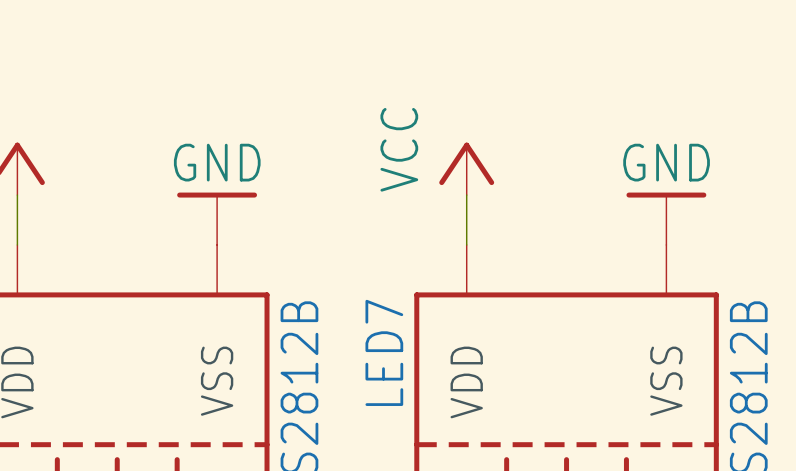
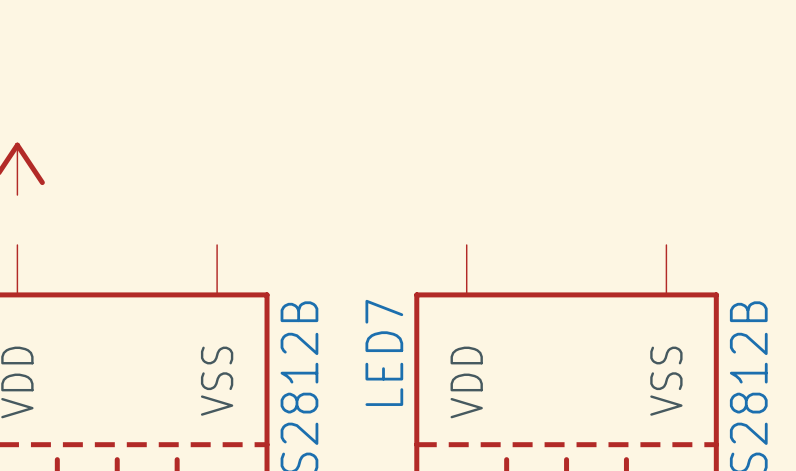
power symbol: VCC (466, 168) -> none
wire: (17, 195) (17, 244) -> none
wire: (466, 195) (466, 244) -> none
power symbol: GND (217, 218) -> none
power symbol: GND (666, 218) -> none

